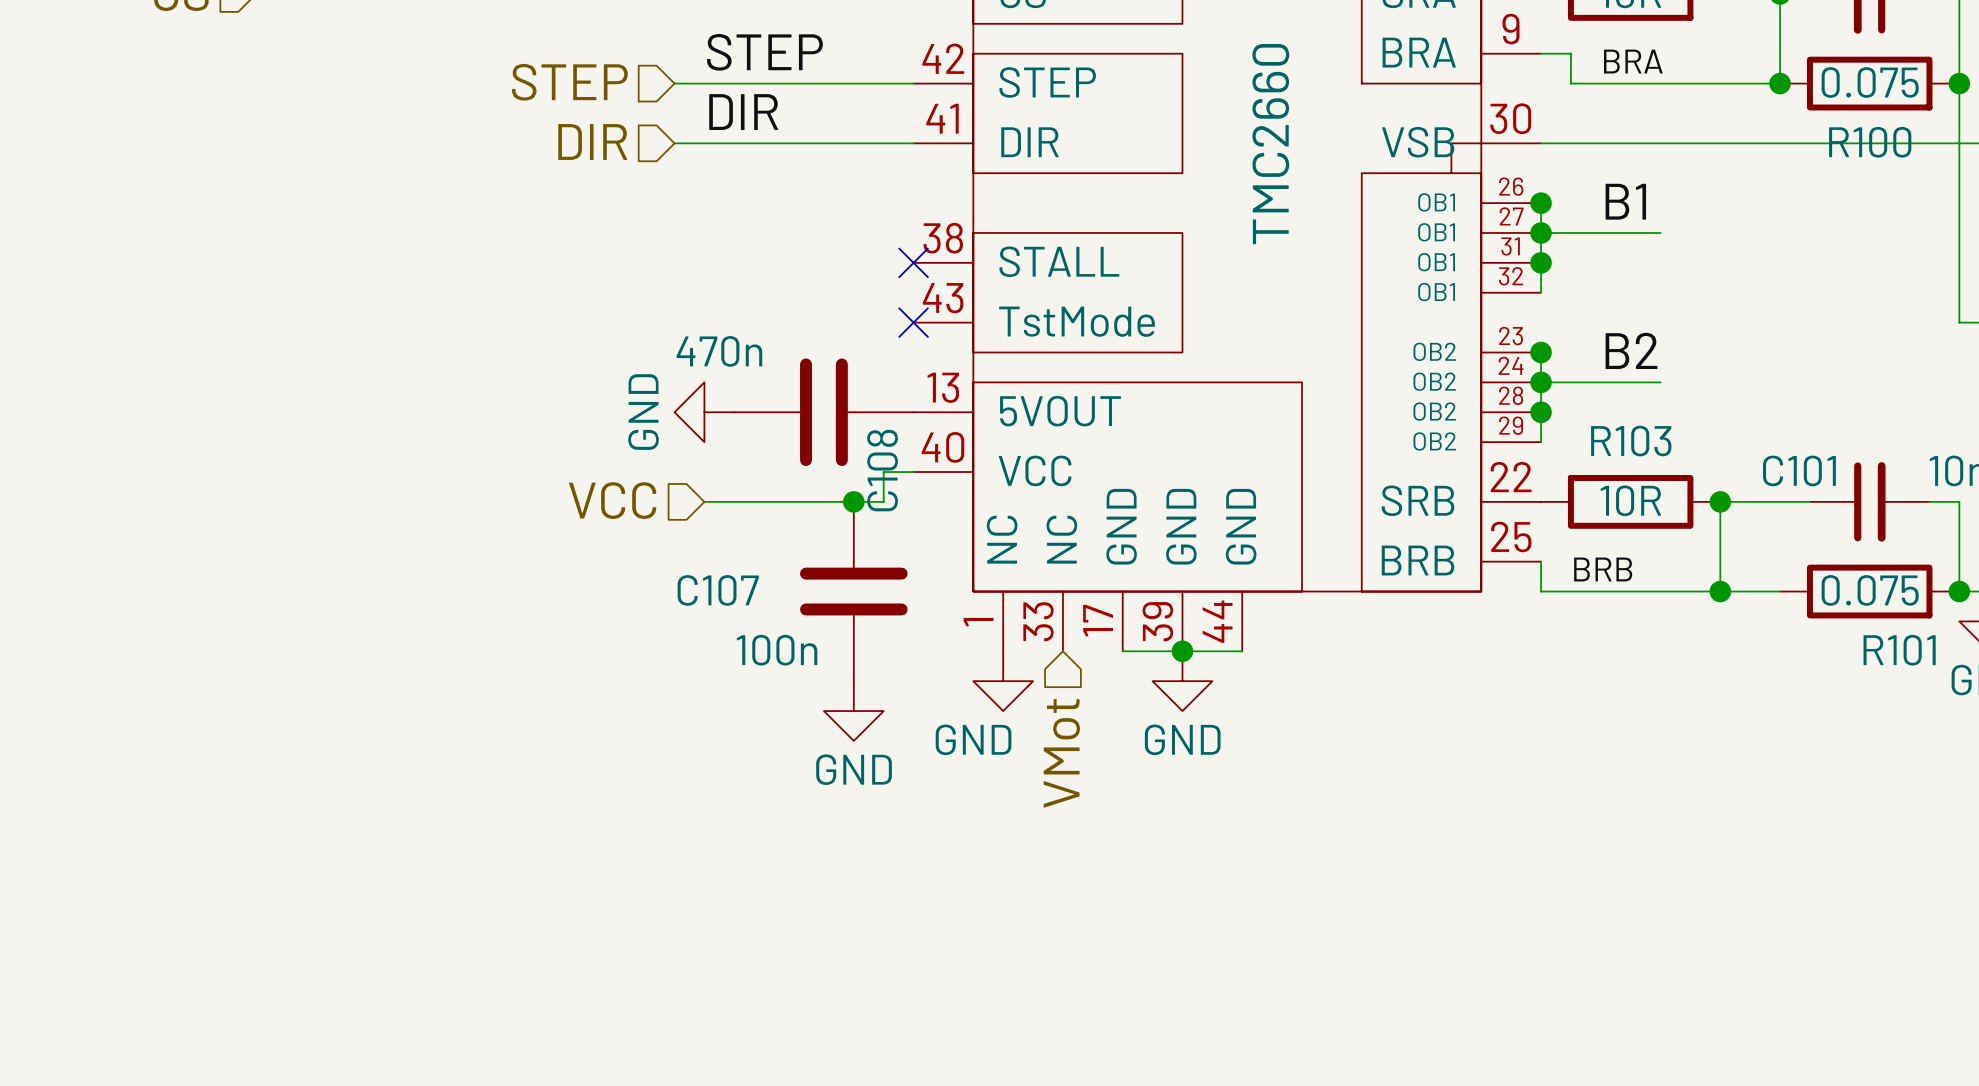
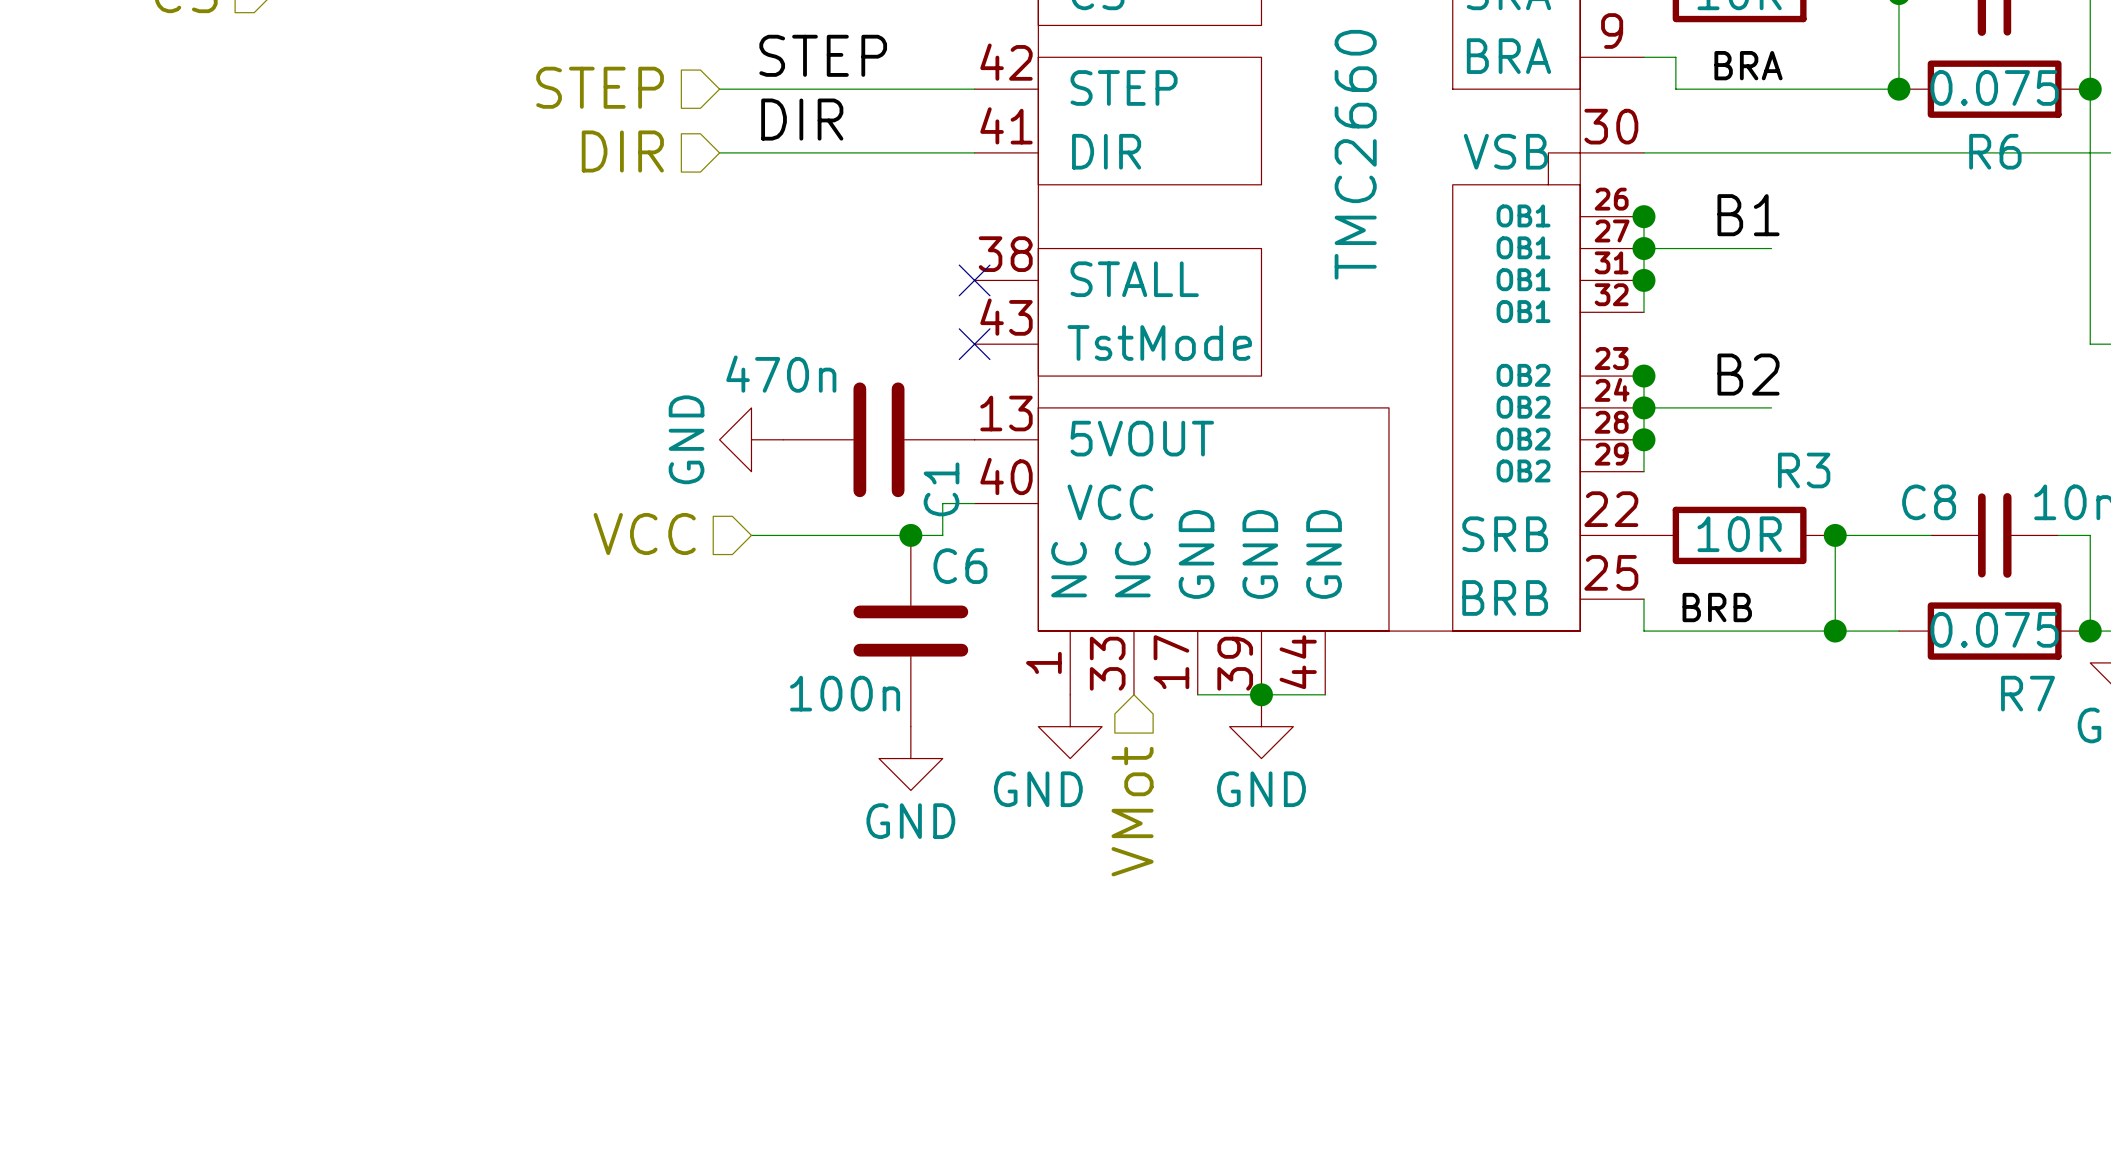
R100 name: R100 (1870, 142) -> R6 (1995, 151)
R103 name: R103 (1631, 441) -> R3 (1804, 470)
C108 name: C108 (882, 470) -> C1 (941, 489)
C101 name: C101 (1799, 470) -> C8 (1929, 502)
C107 name: C107 (718, 590) -> C6 (960, 566)
R101 name: R101 (1899, 650) -> R7 (2028, 693)

